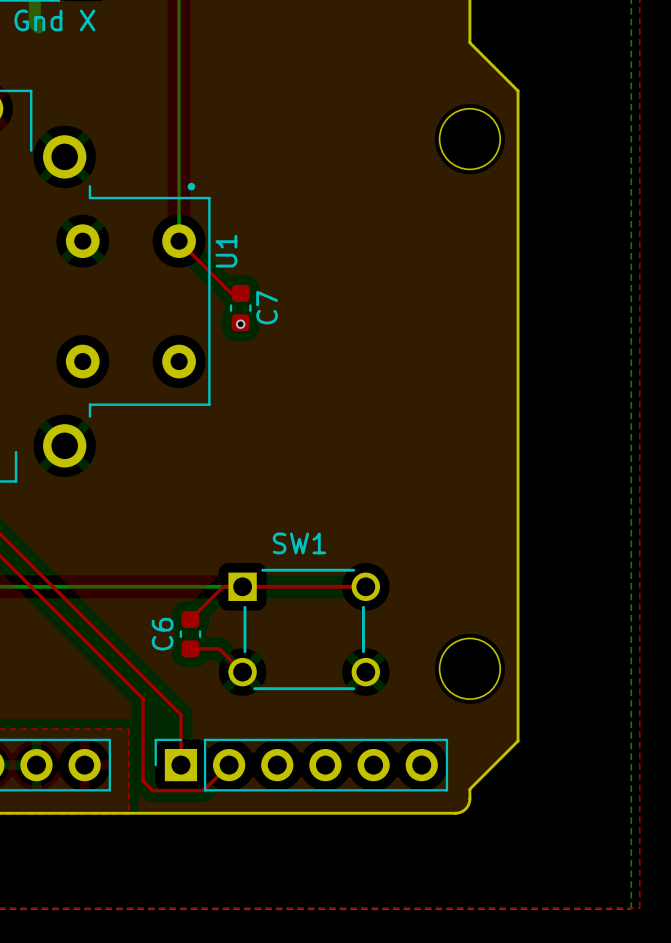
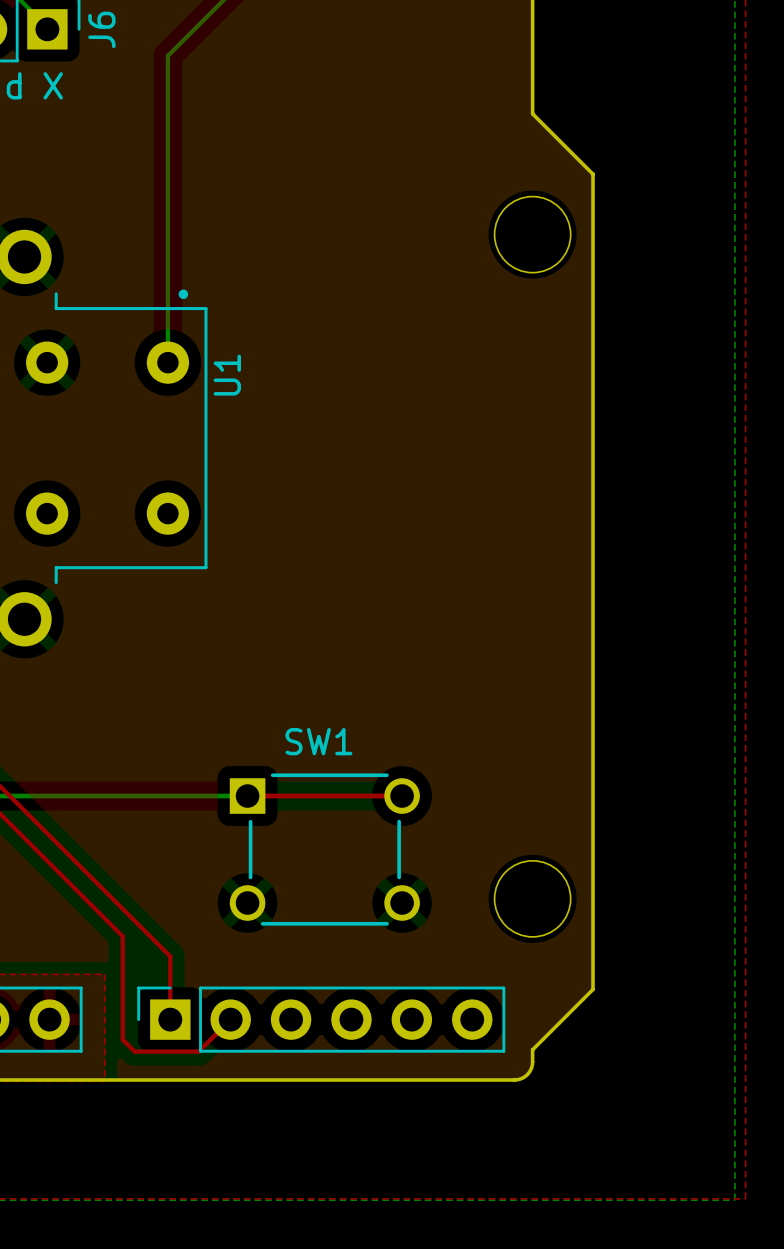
top track: (179, 241) (231, 293) (240, 293) -> none
C7: (240, 308) -> none
via: (240, 324) -> none
top track: (242, 586) (223, 586) (190, 619) -> none
C6: (190, 634) -> none
top track: (190, 648) (219, 648) (242, 672) -> none

